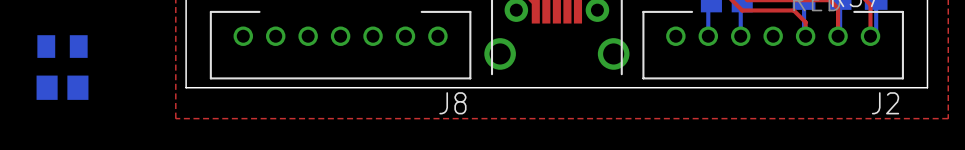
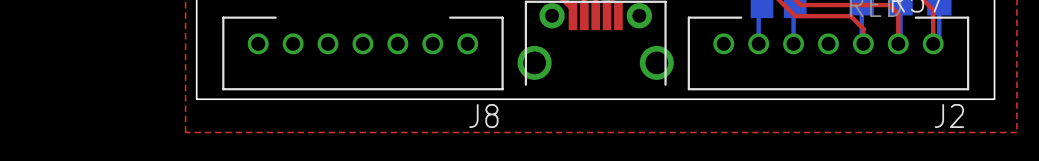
part: (62, 46) -> none
part: (62, 87) -> none

